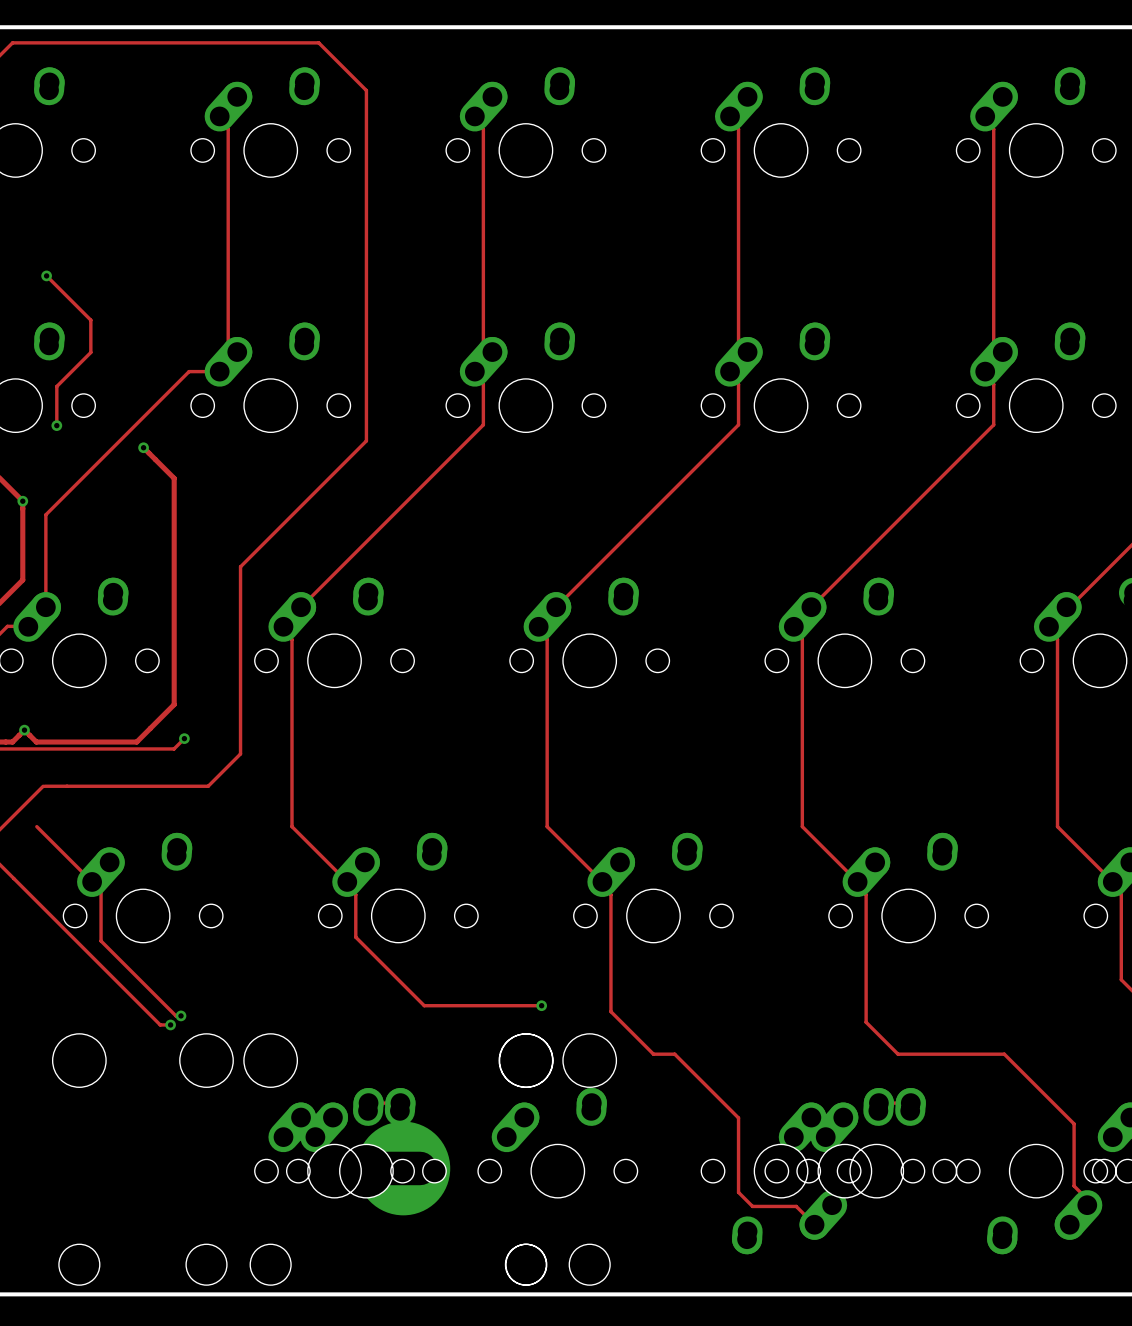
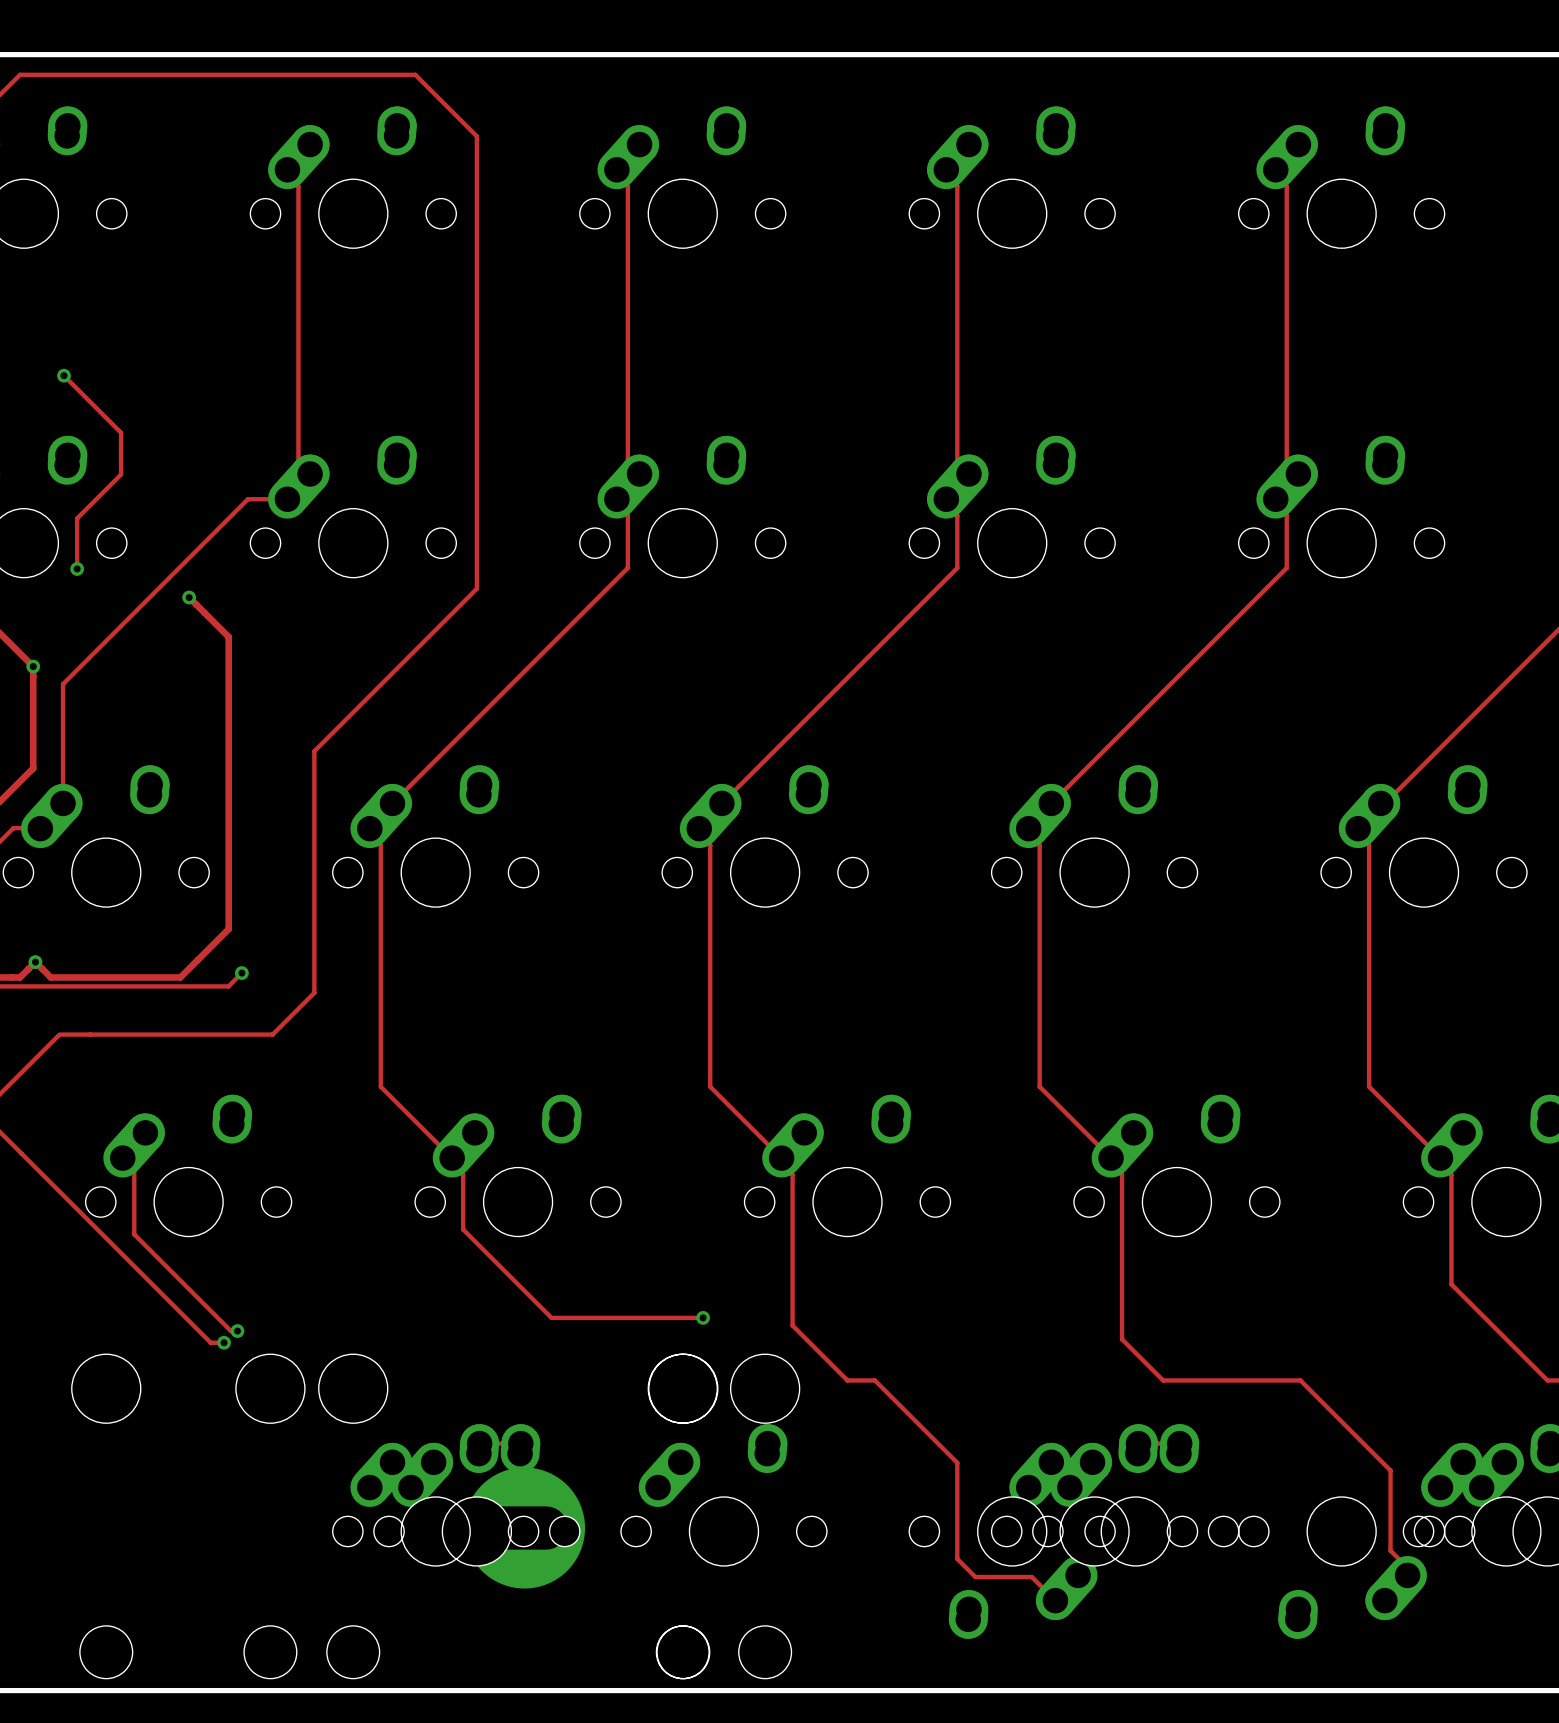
track: (36, 826) (92, 881) -> none

